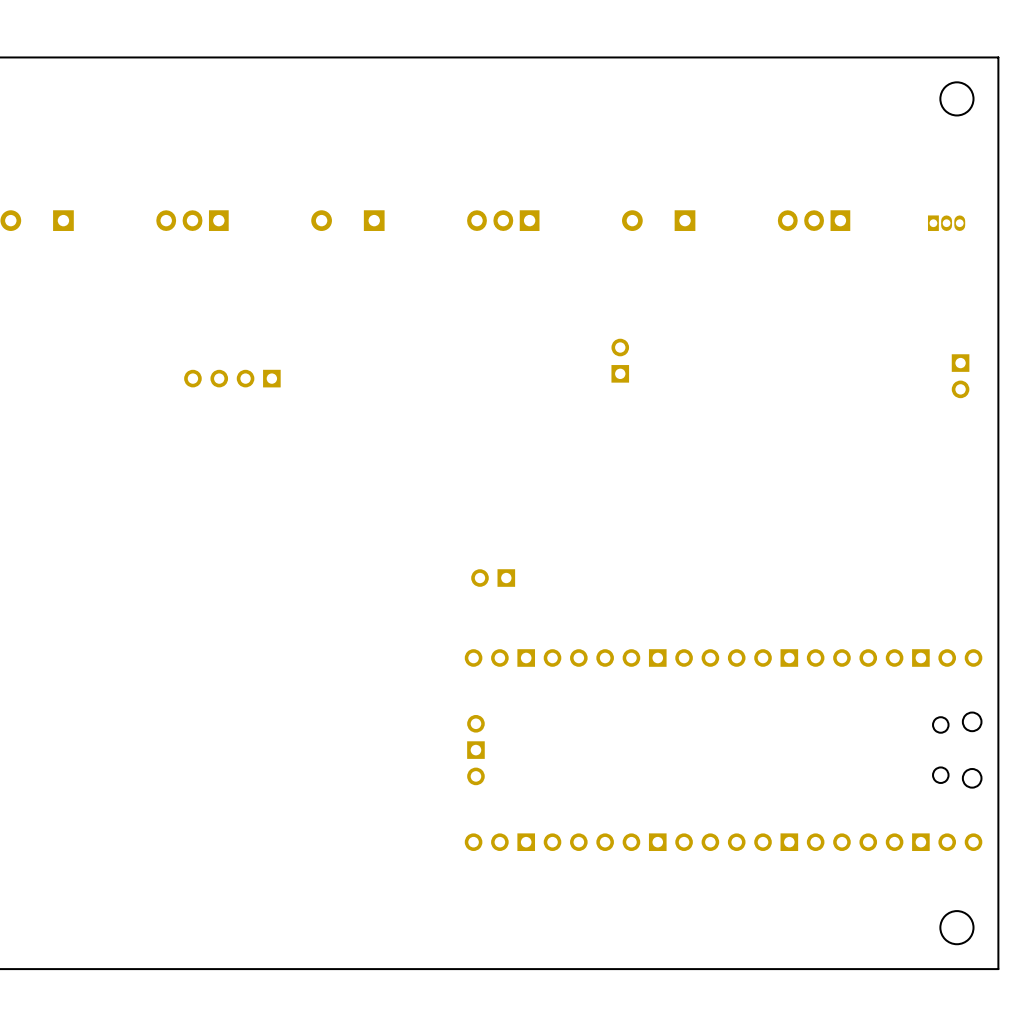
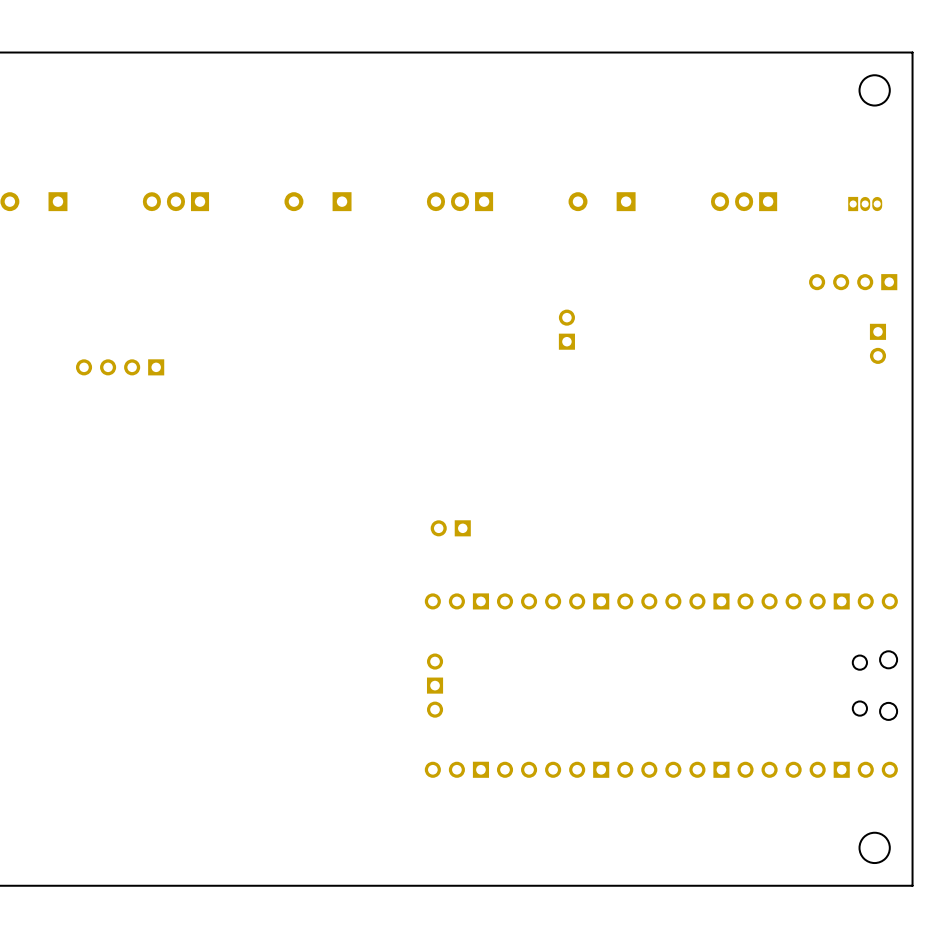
part: none -> (853, 282)
part position: (232, 378) -> (120, 367)

